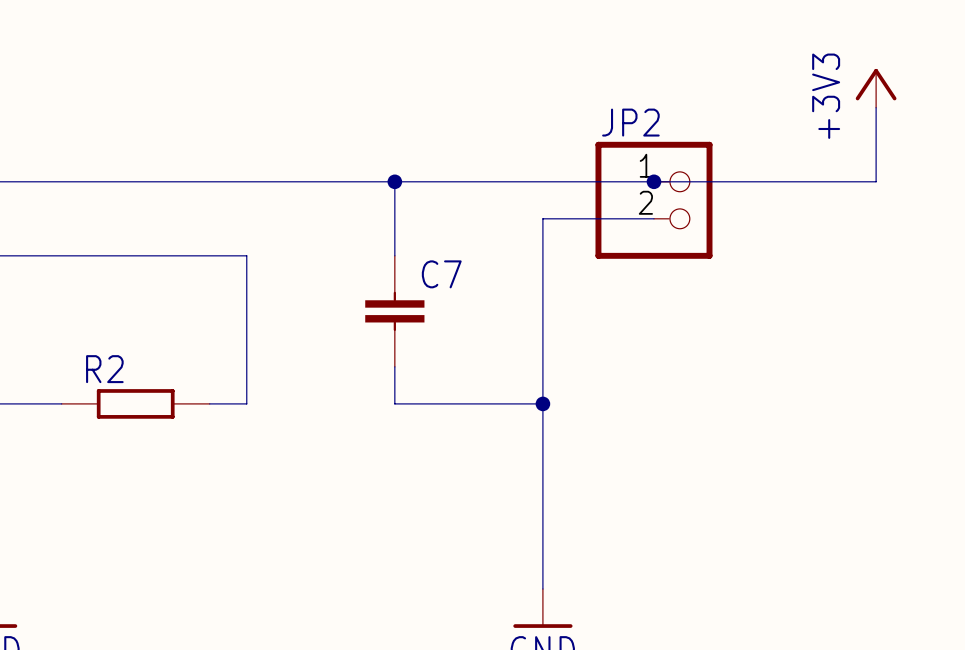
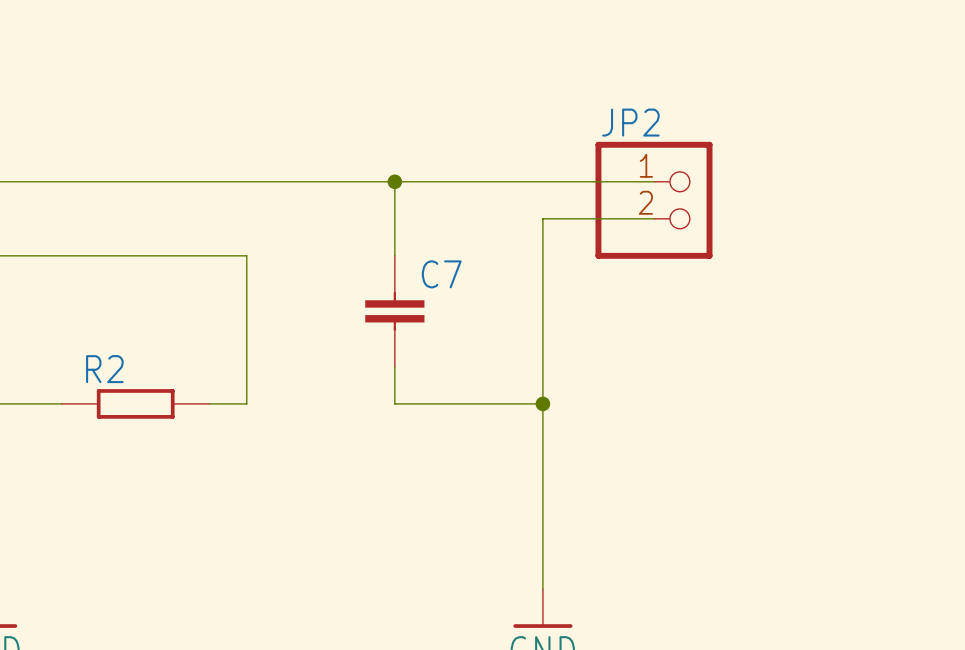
power symbol: +3V3 (876, 88) -> none
wire: (876, 107) (876, 181) (653, 181) -> none
junction: (653, 181) -> none

